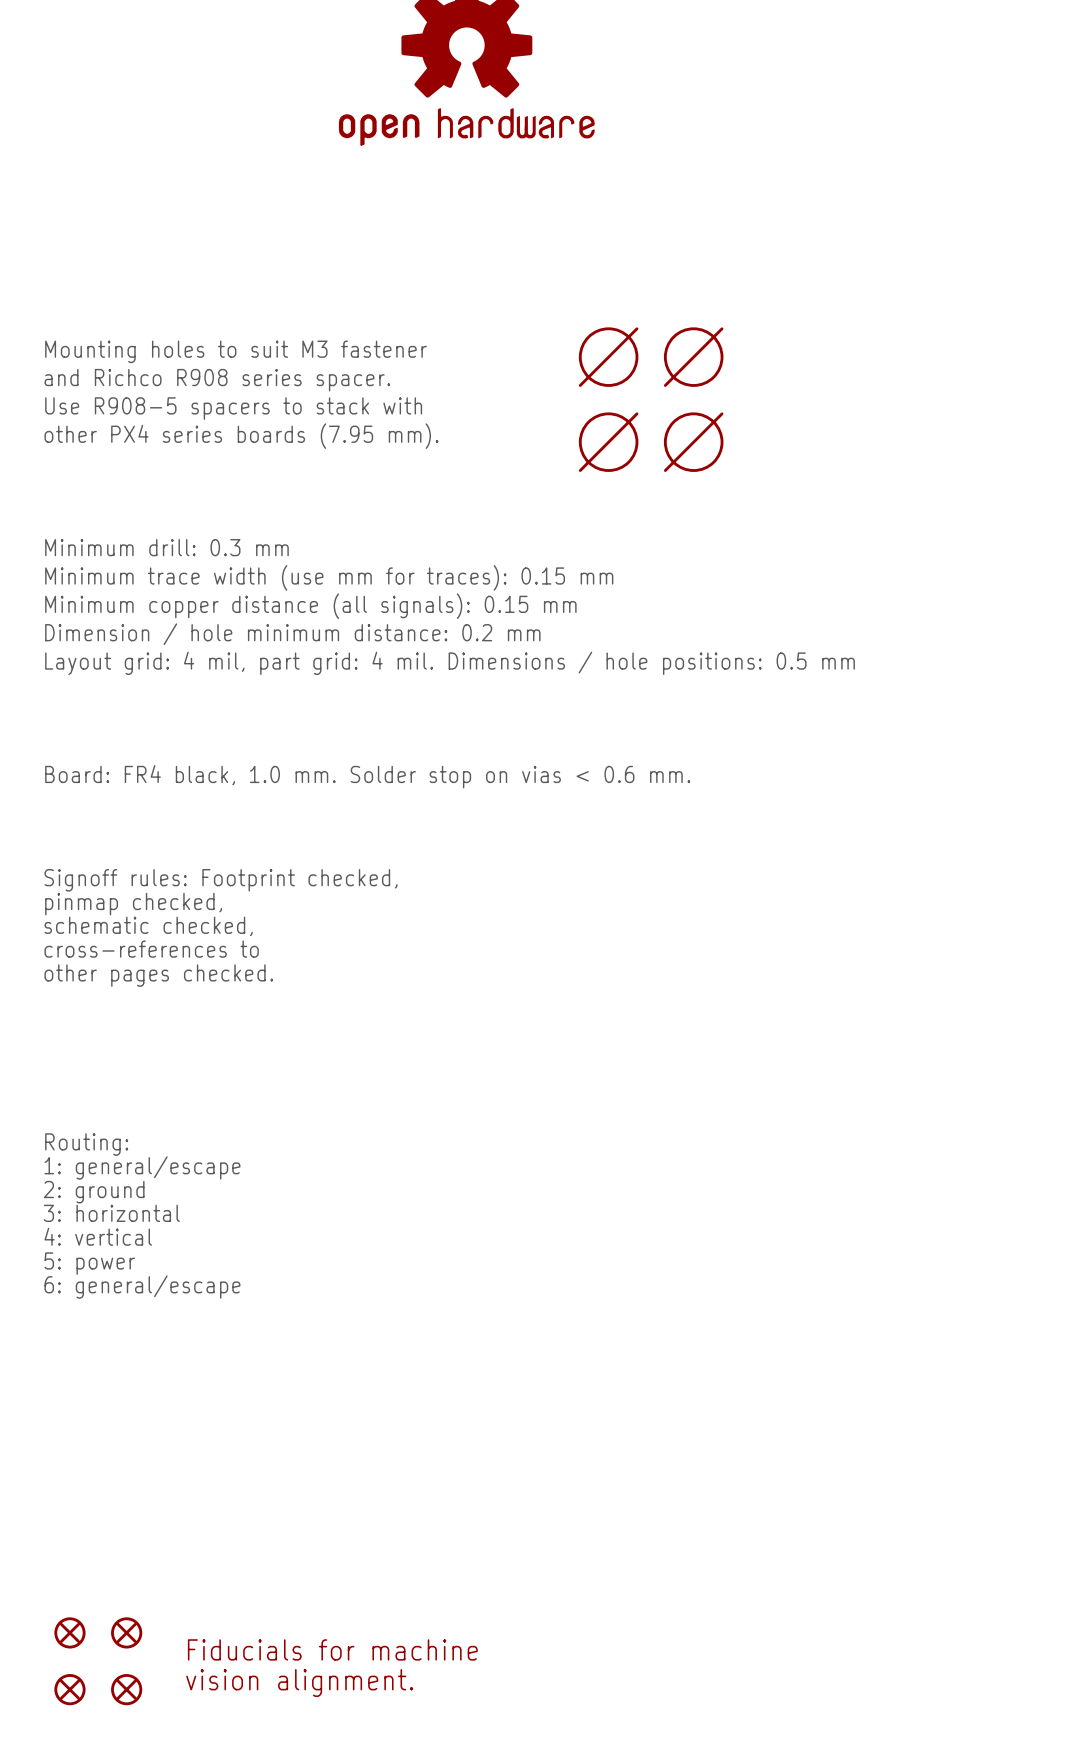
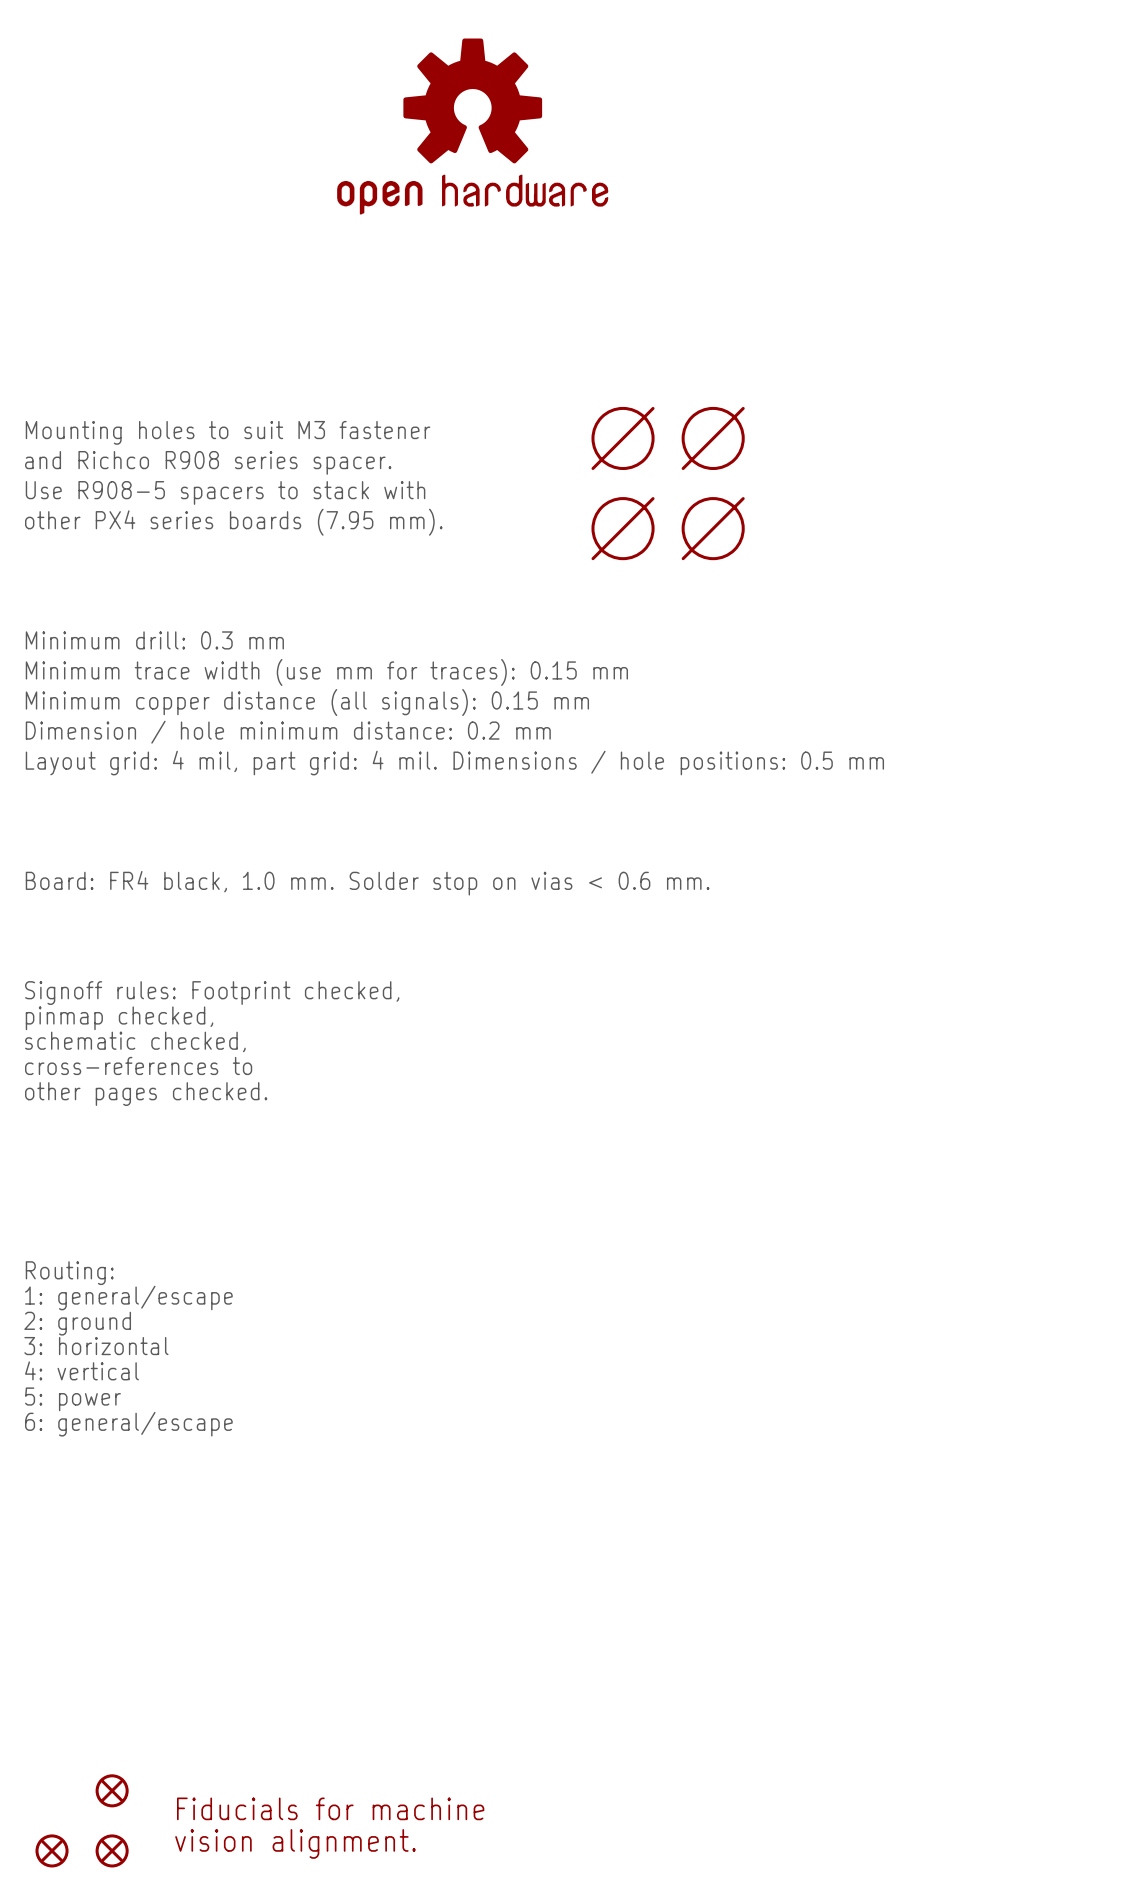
part: (69, 1632) -> none

